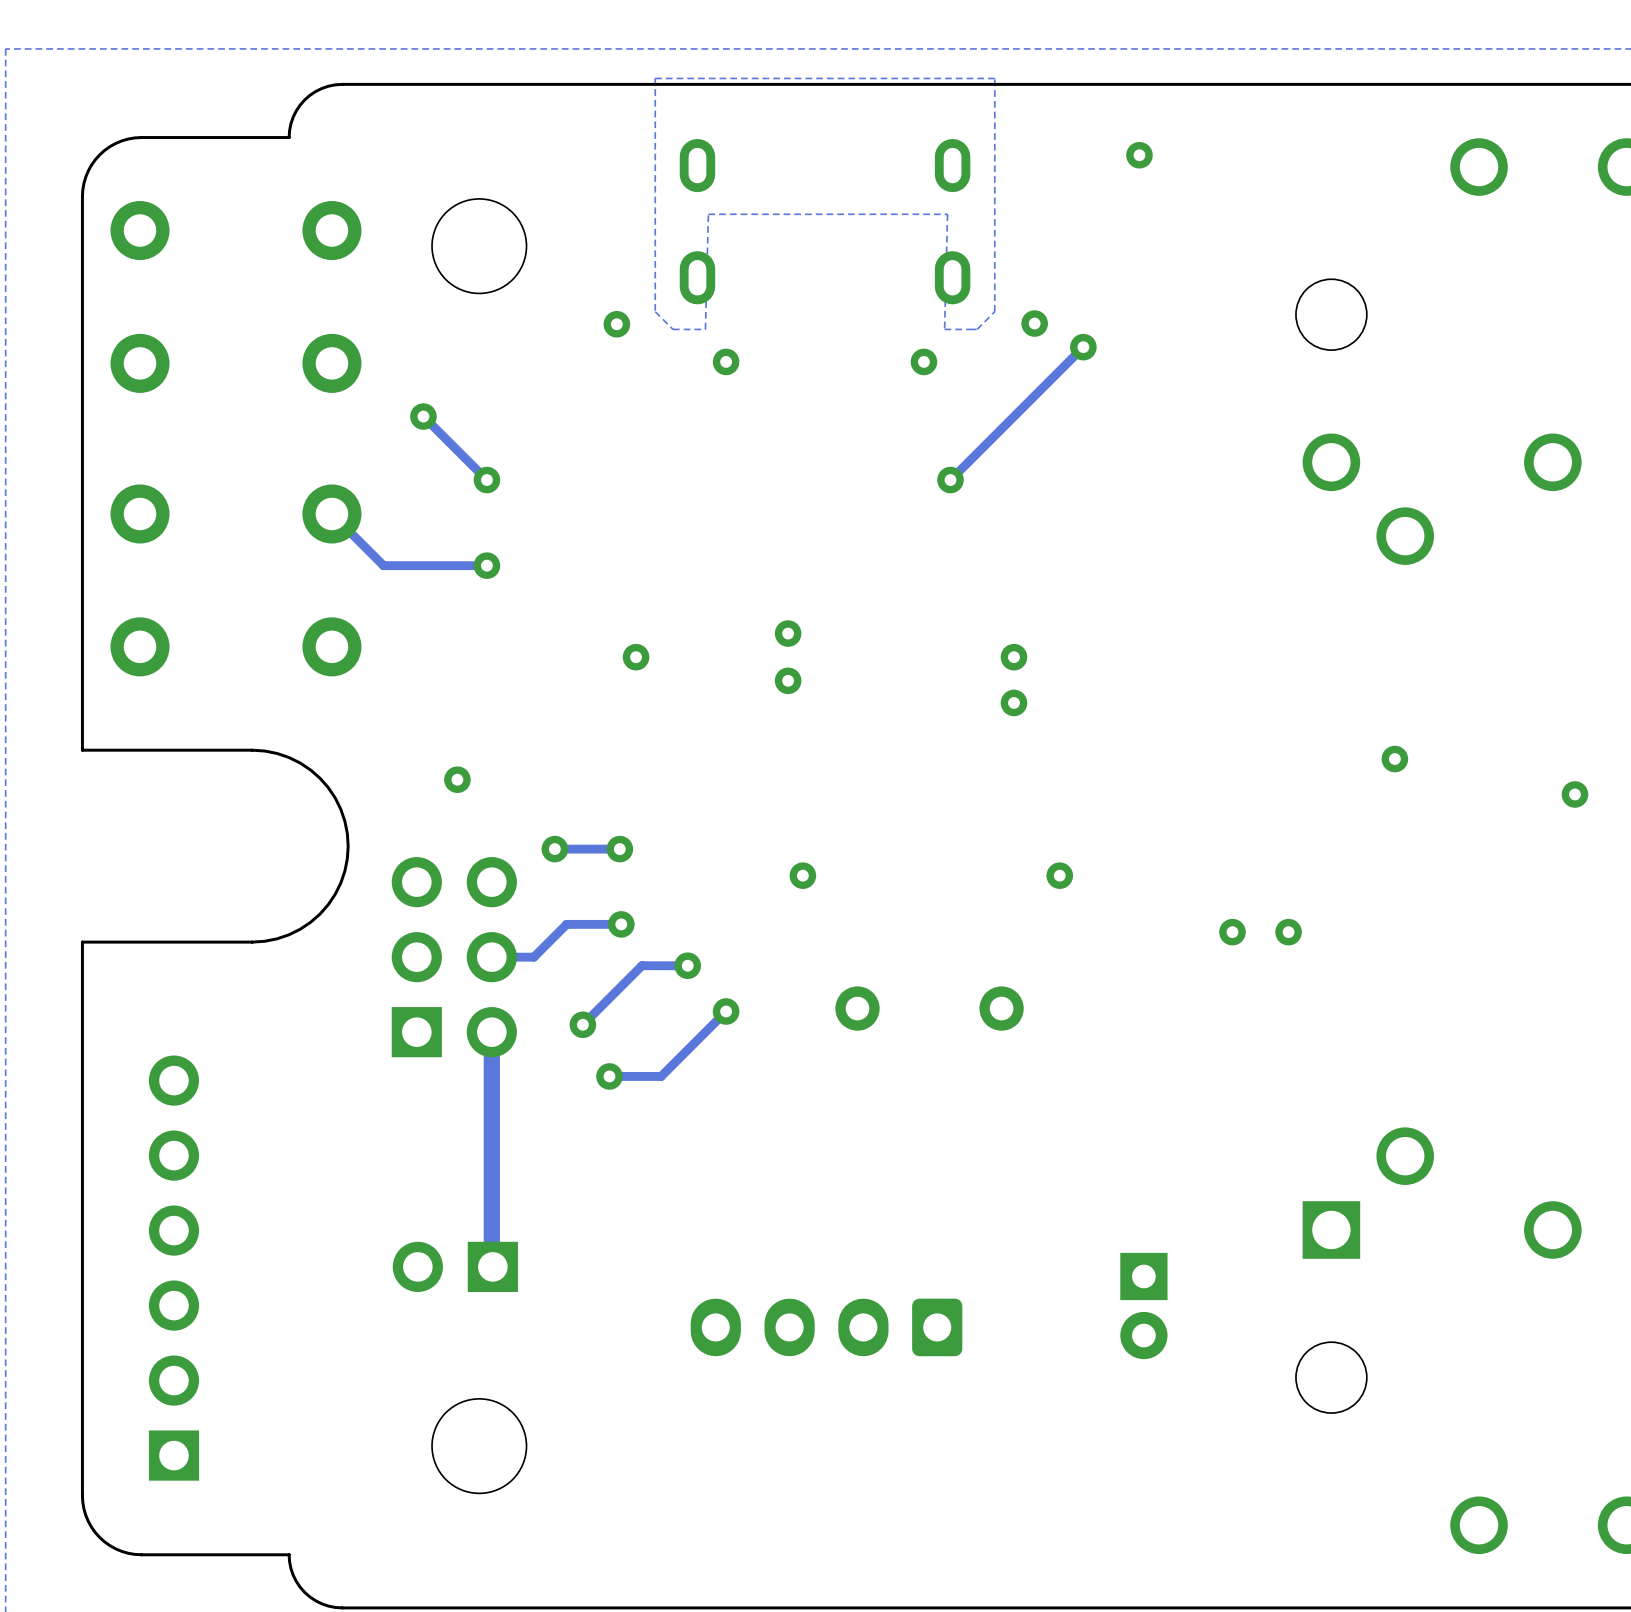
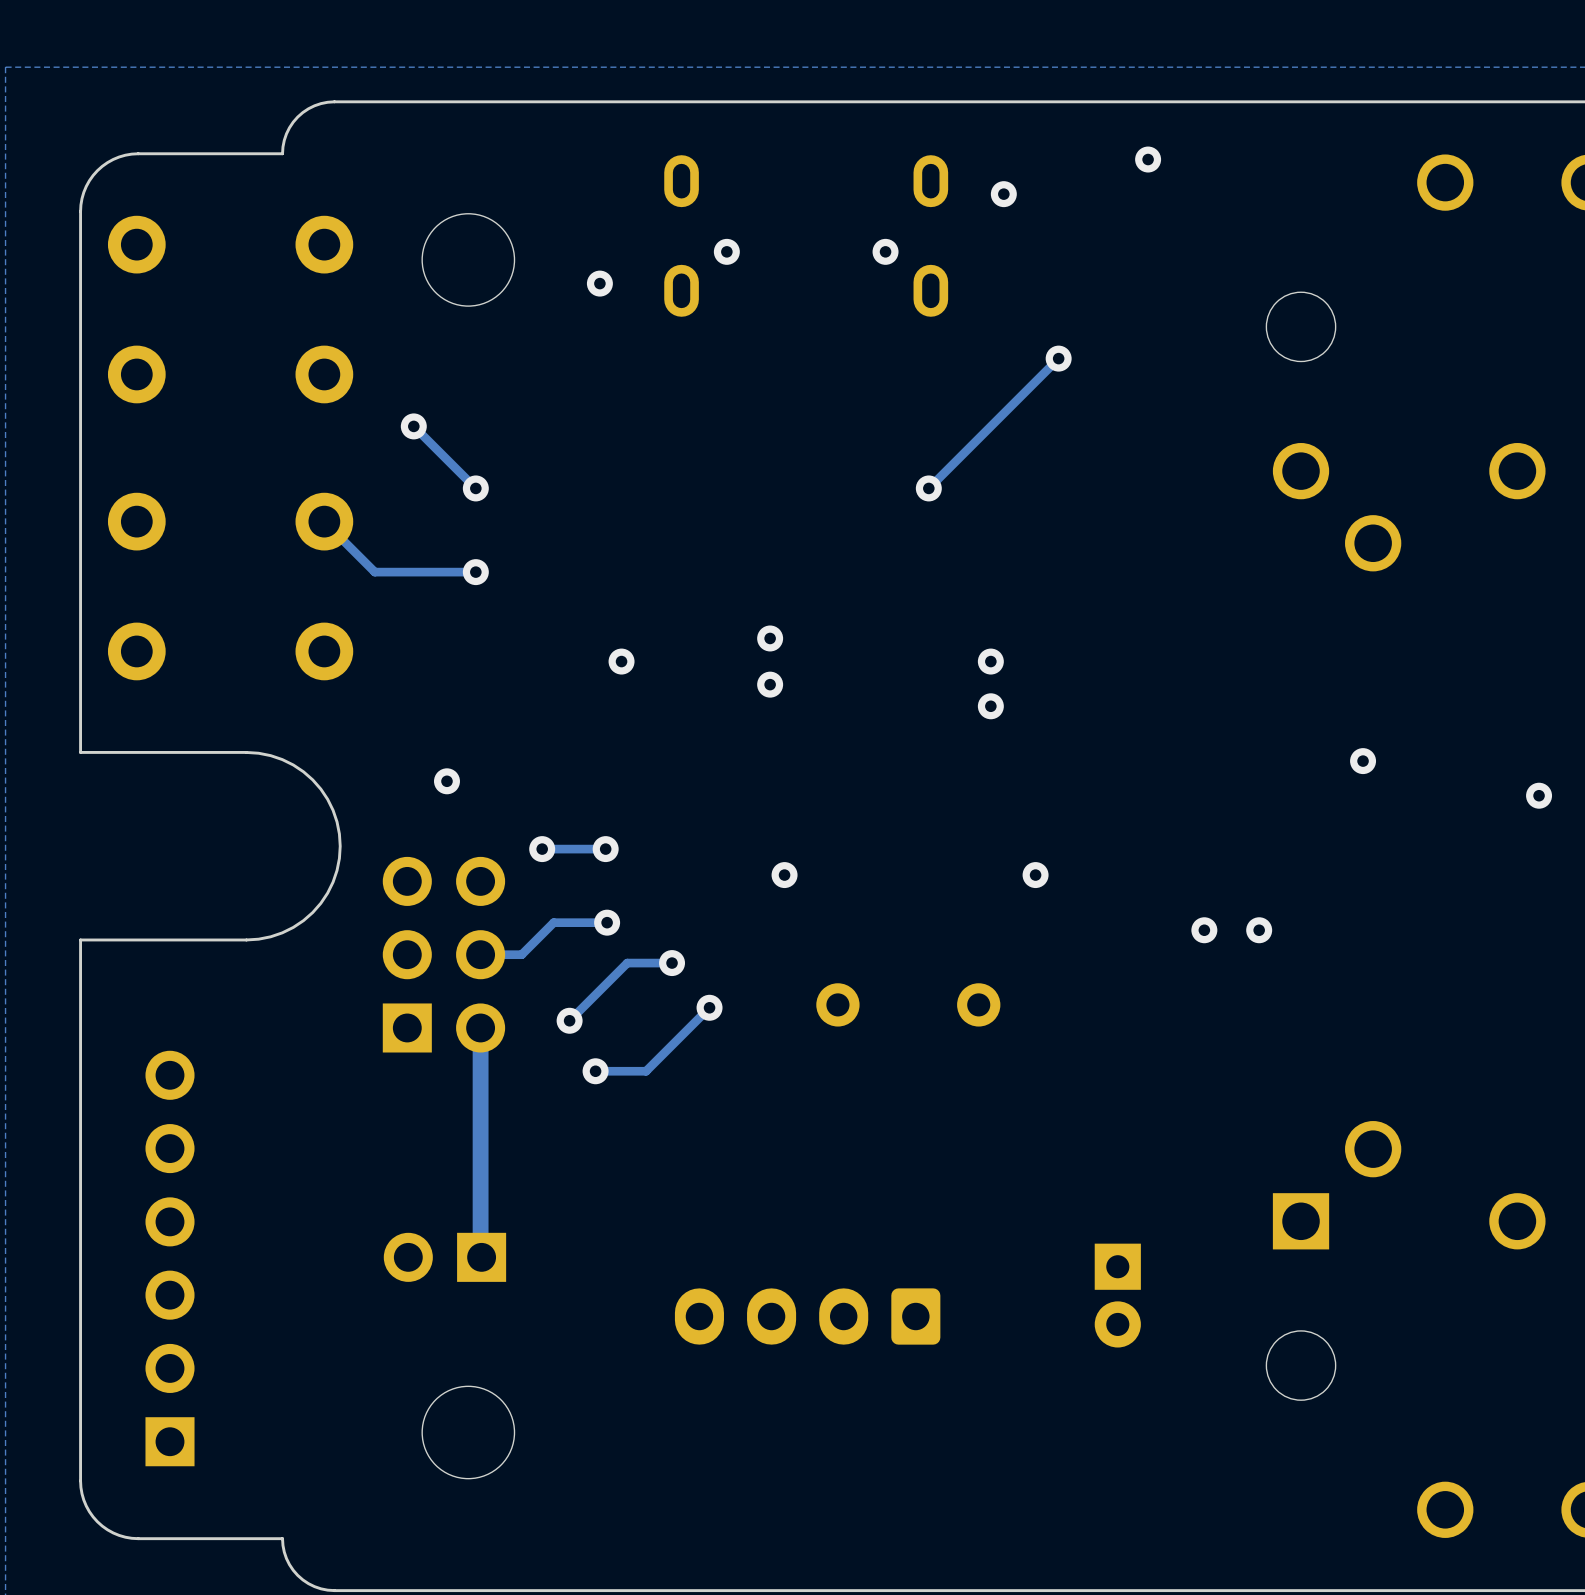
zone outline: (994, 78) (994, 311) (977, 329) (944, 329) (947, 214) (708, 214) (705, 329) (672, 329) (655, 311) (655, 78) (994, 78) -> none
via position: (1139, 155) -> (1148, 159)
via: none -> (1003, 194)
via: none -> (726, 251)
via: none -> (885, 251)
via: (1034, 323) -> none
via position: (616, 324) -> (599, 283)
via: (726, 361) -> none
via: (923, 361) -> none

